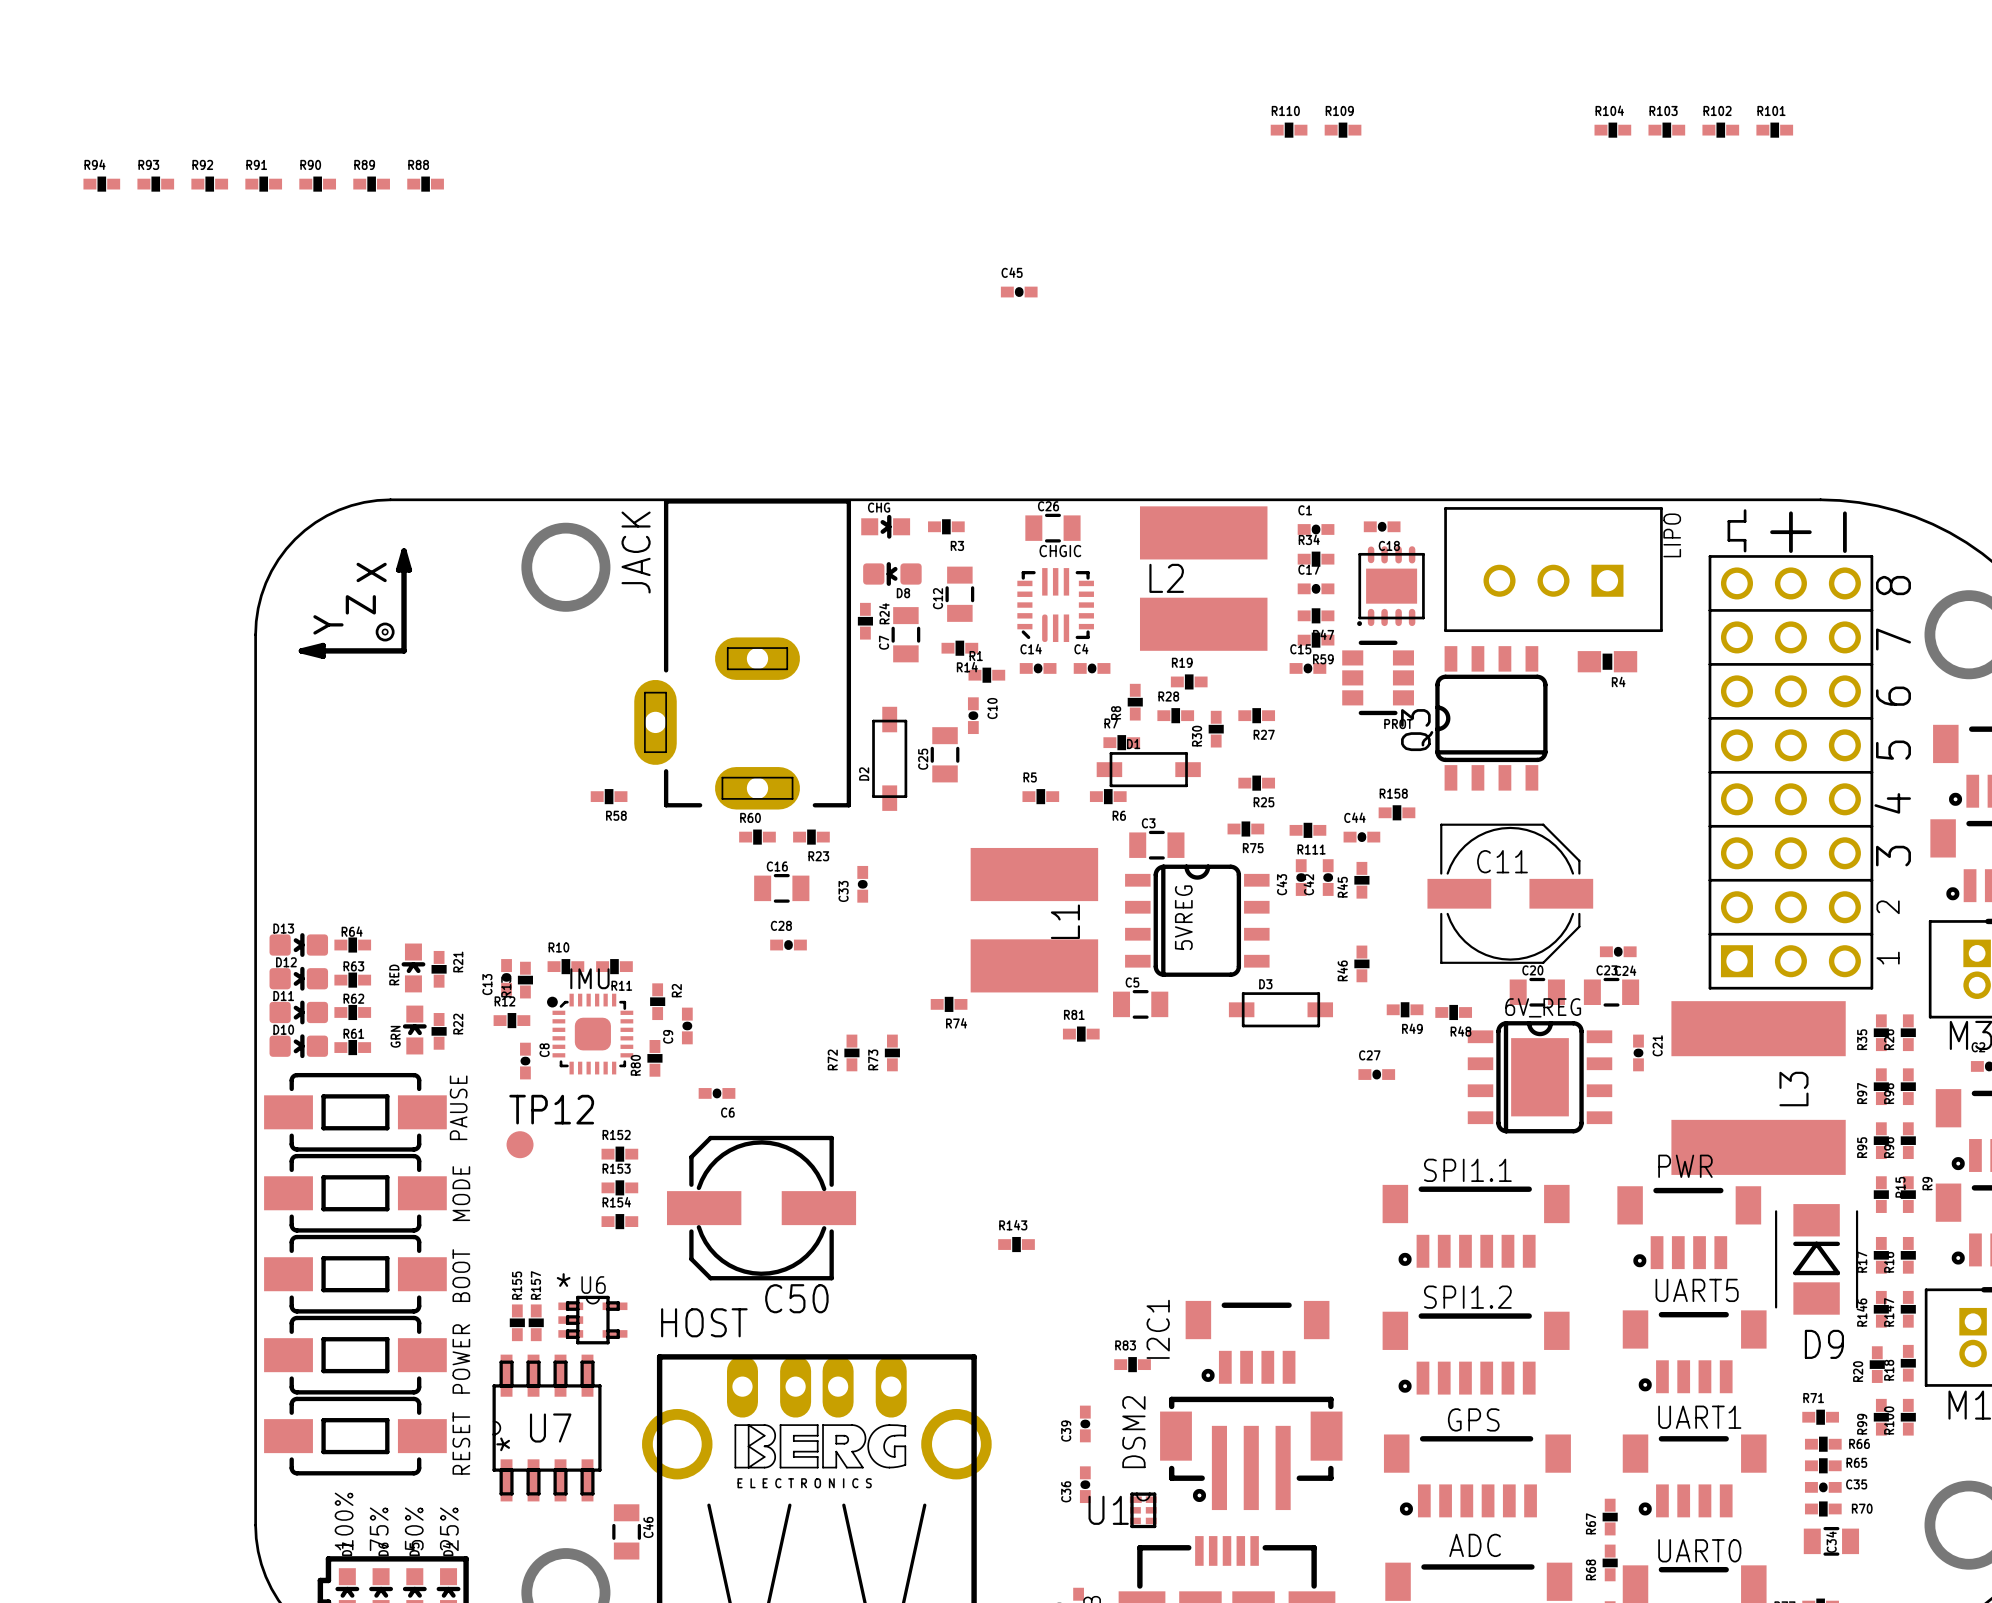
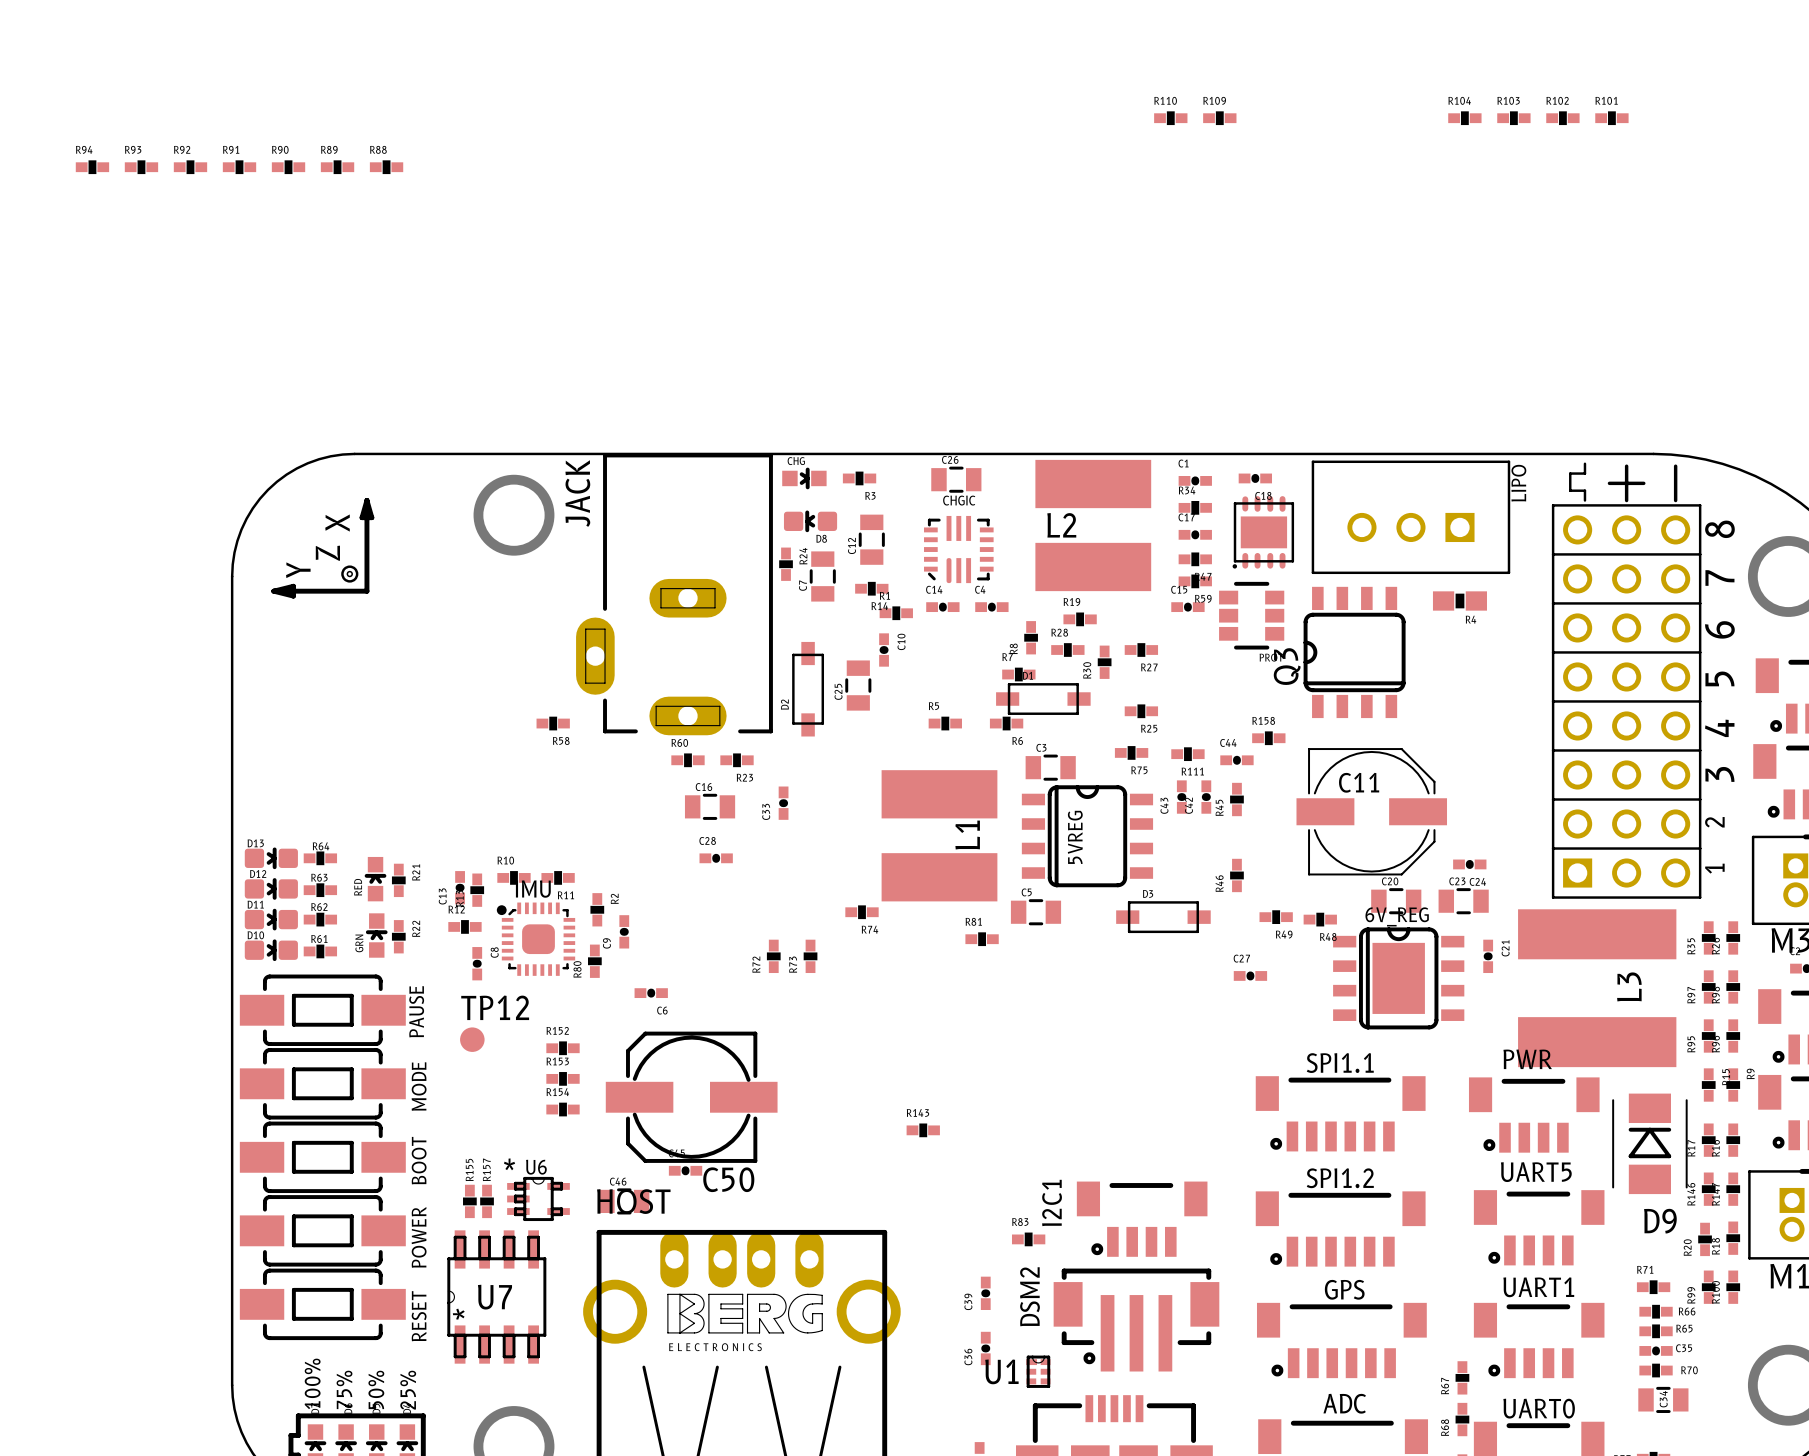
C45 position: (1019, 292) -> (685, 1170)
C46 rotation: 0° (626, 1531) -> 90° clockwise (624, 1201)
C46 position: (626, 1531) -> (624, 1201)

